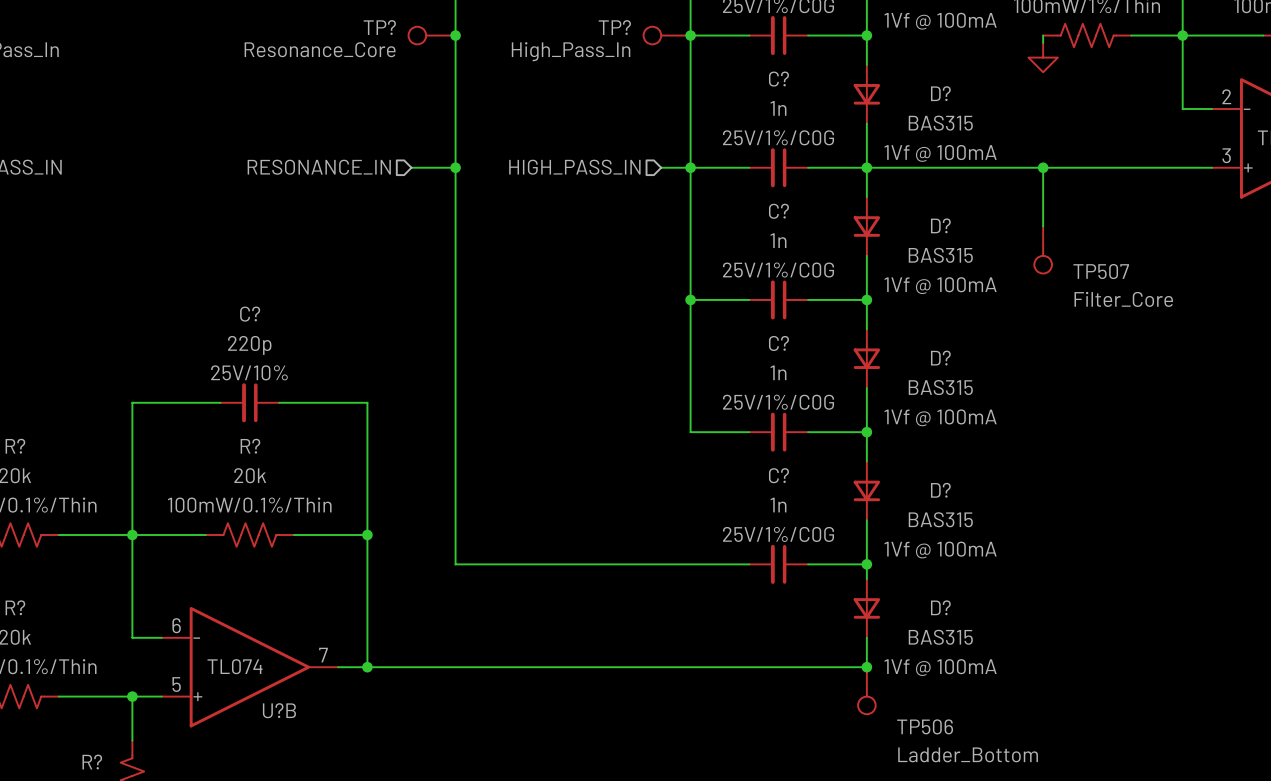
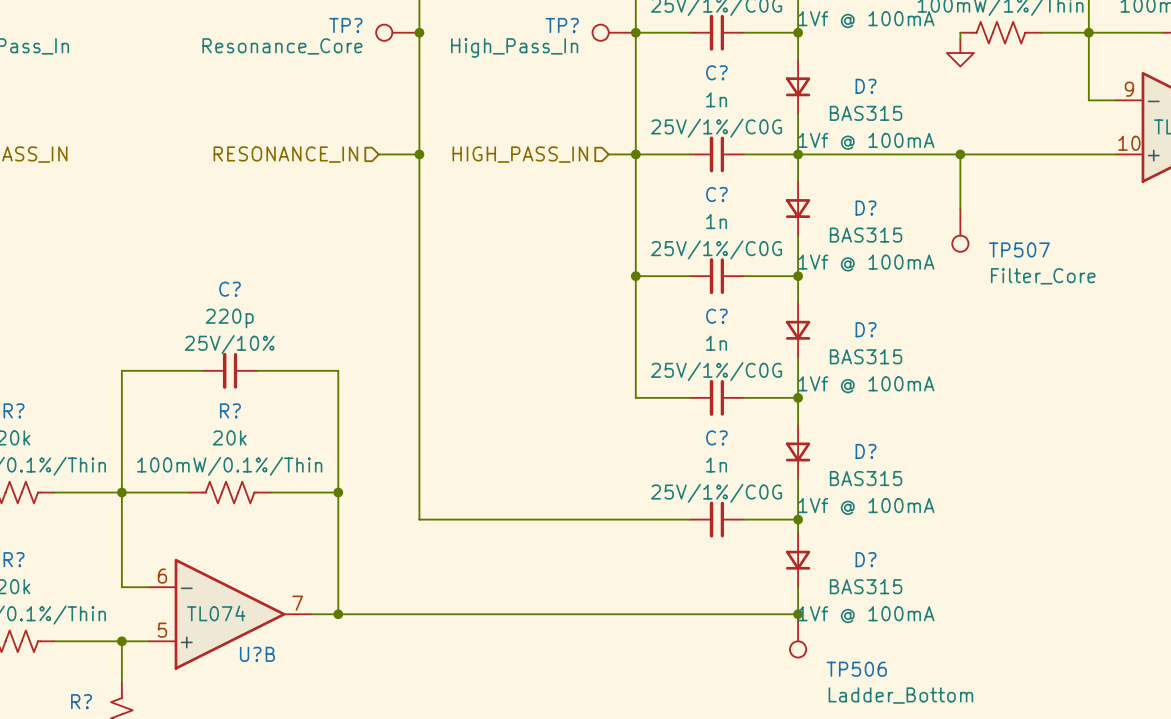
part pin number: 2 (1226, 96) -> 9 (1129, 89)
part pin number: 3 (1226, 155) -> 10 (1129, 143)

